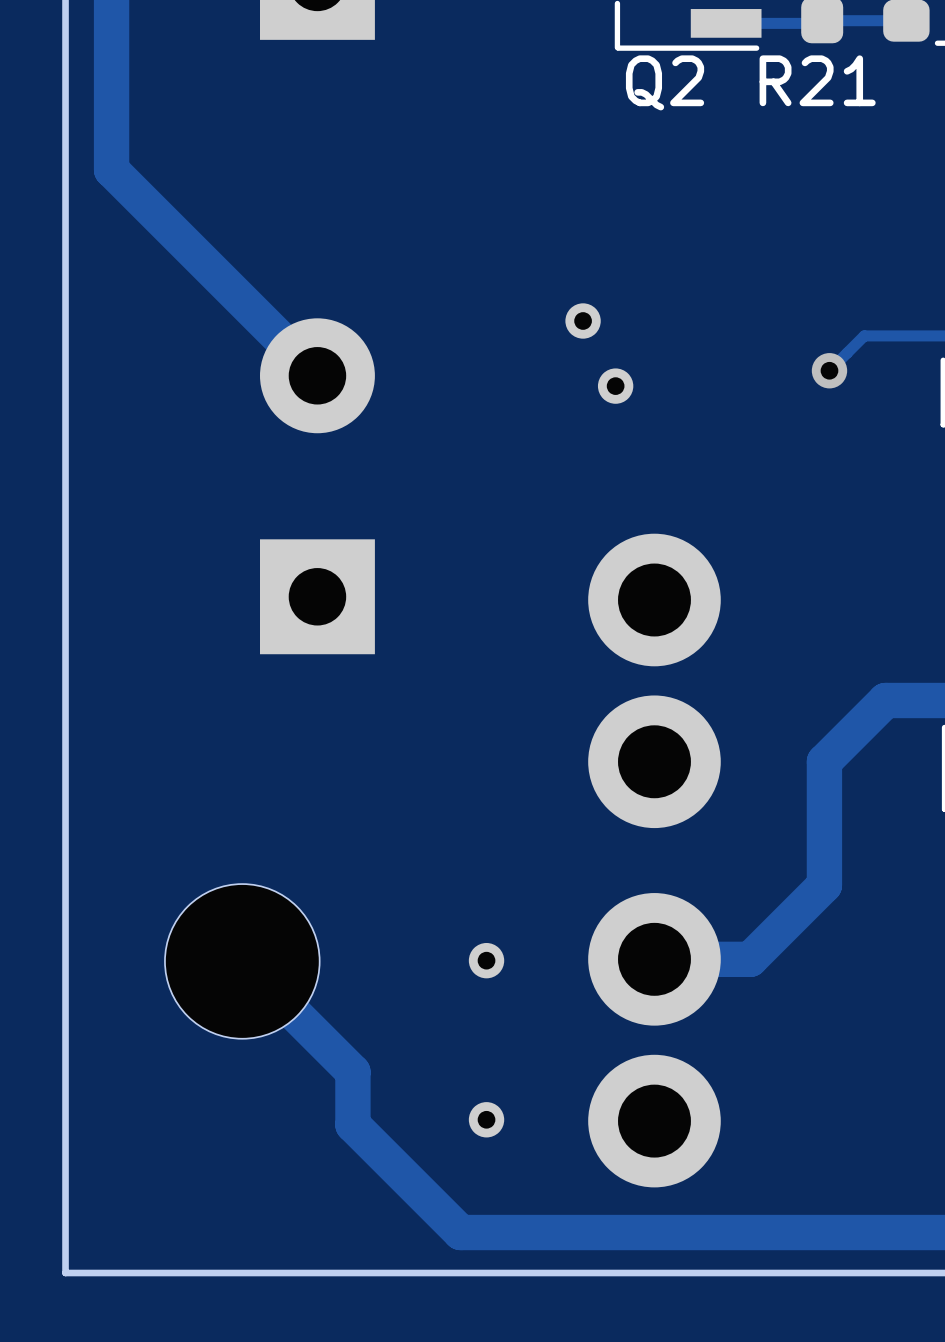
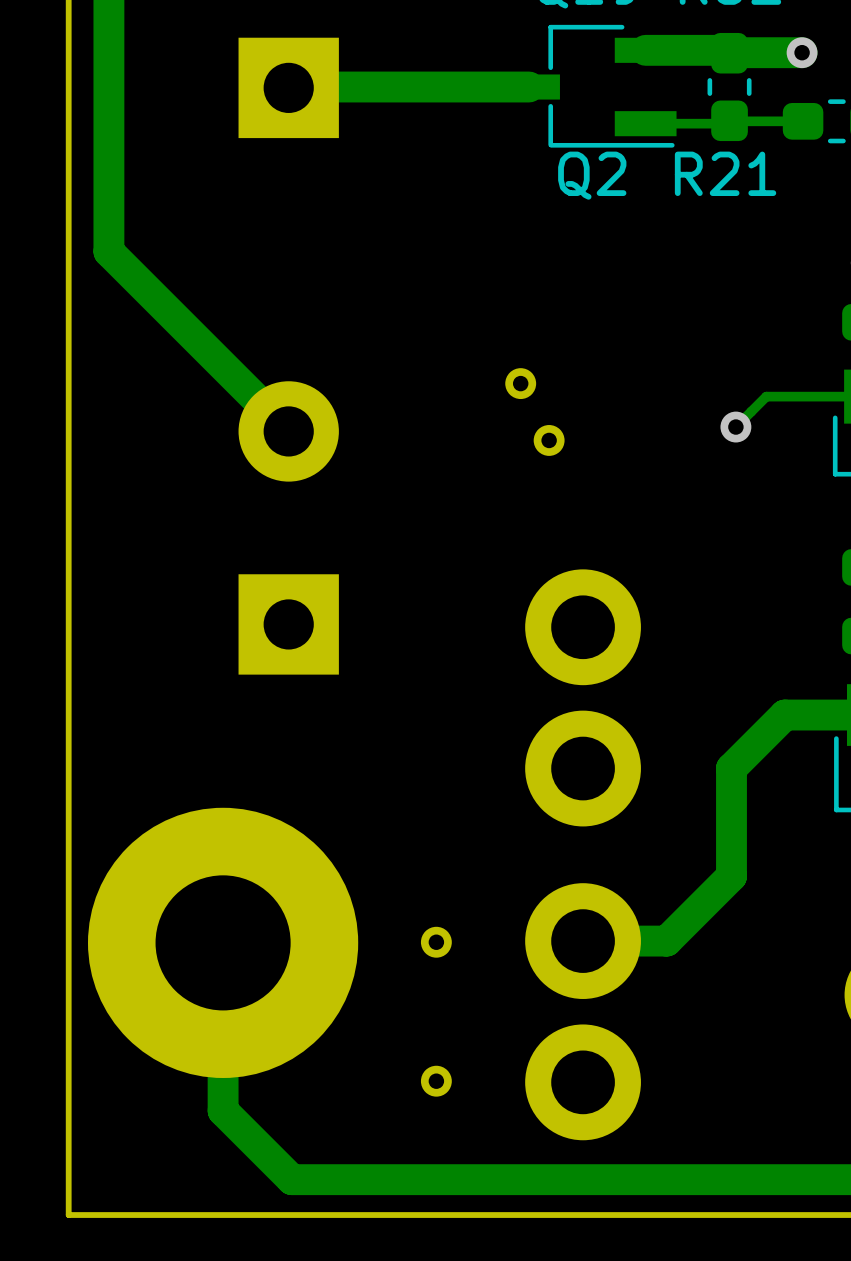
part footprint: [164, 884, 320, 1039] -> [87, 807, 359, 1078]
track: (242, 961) (352, 1072) (352, 1124) (460, 1232) -> (223, 942) (223, 1110) (291, 1179) (413, 1179)

